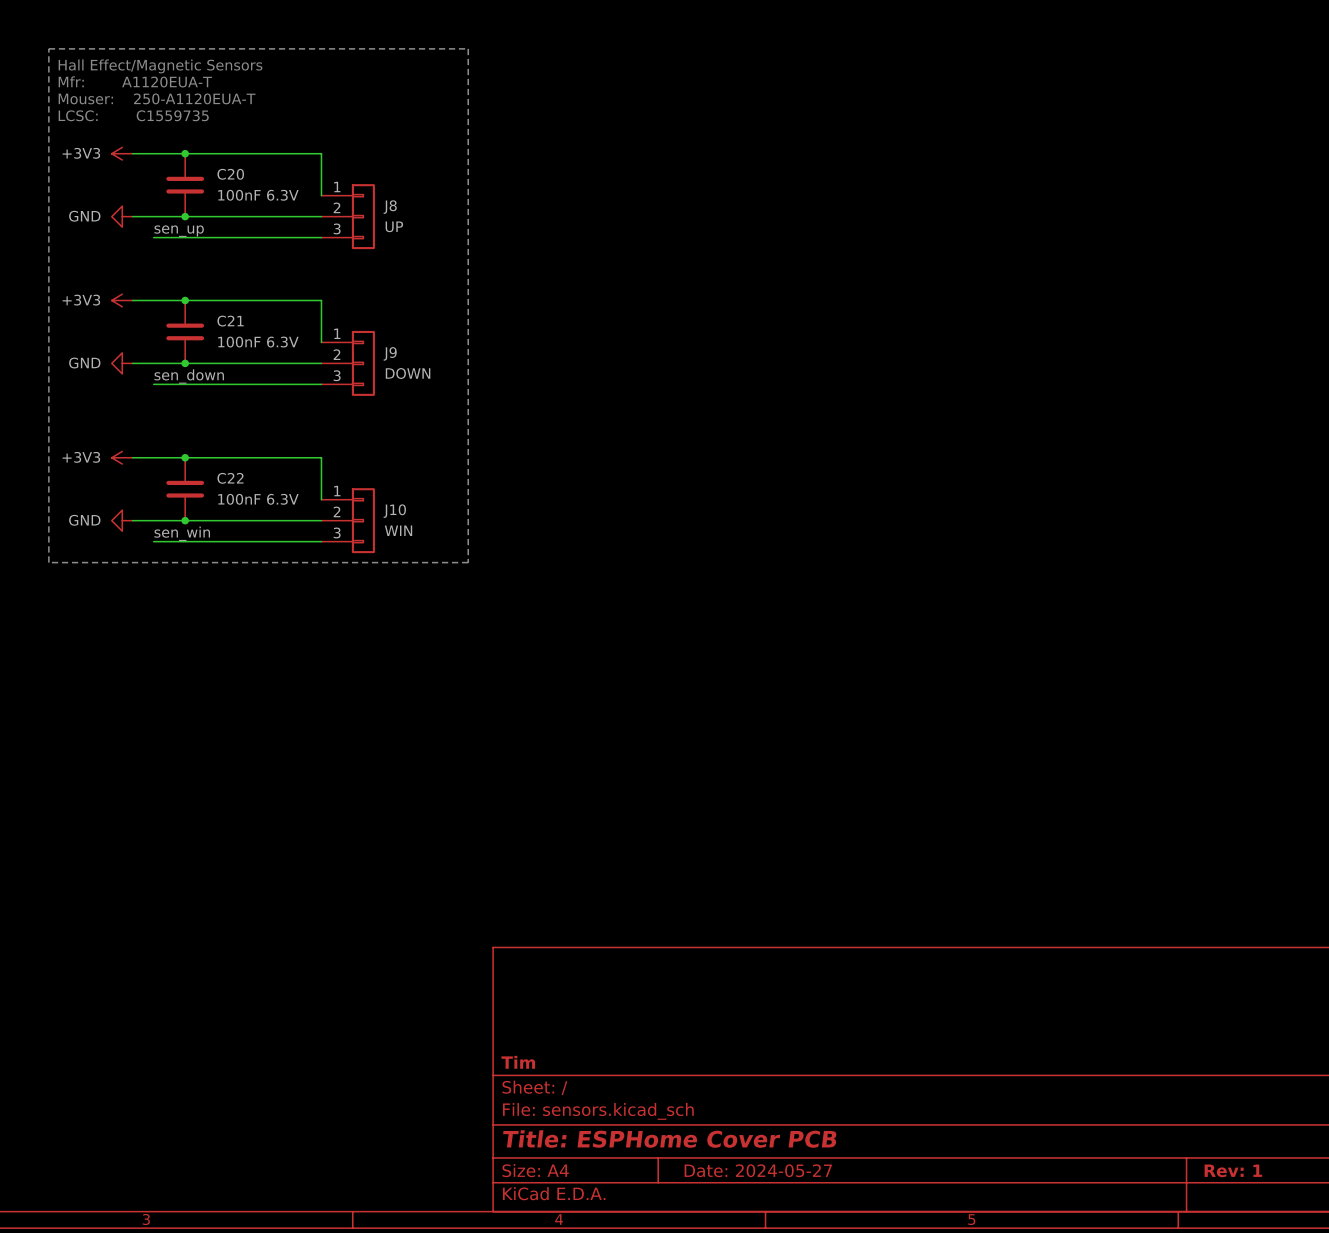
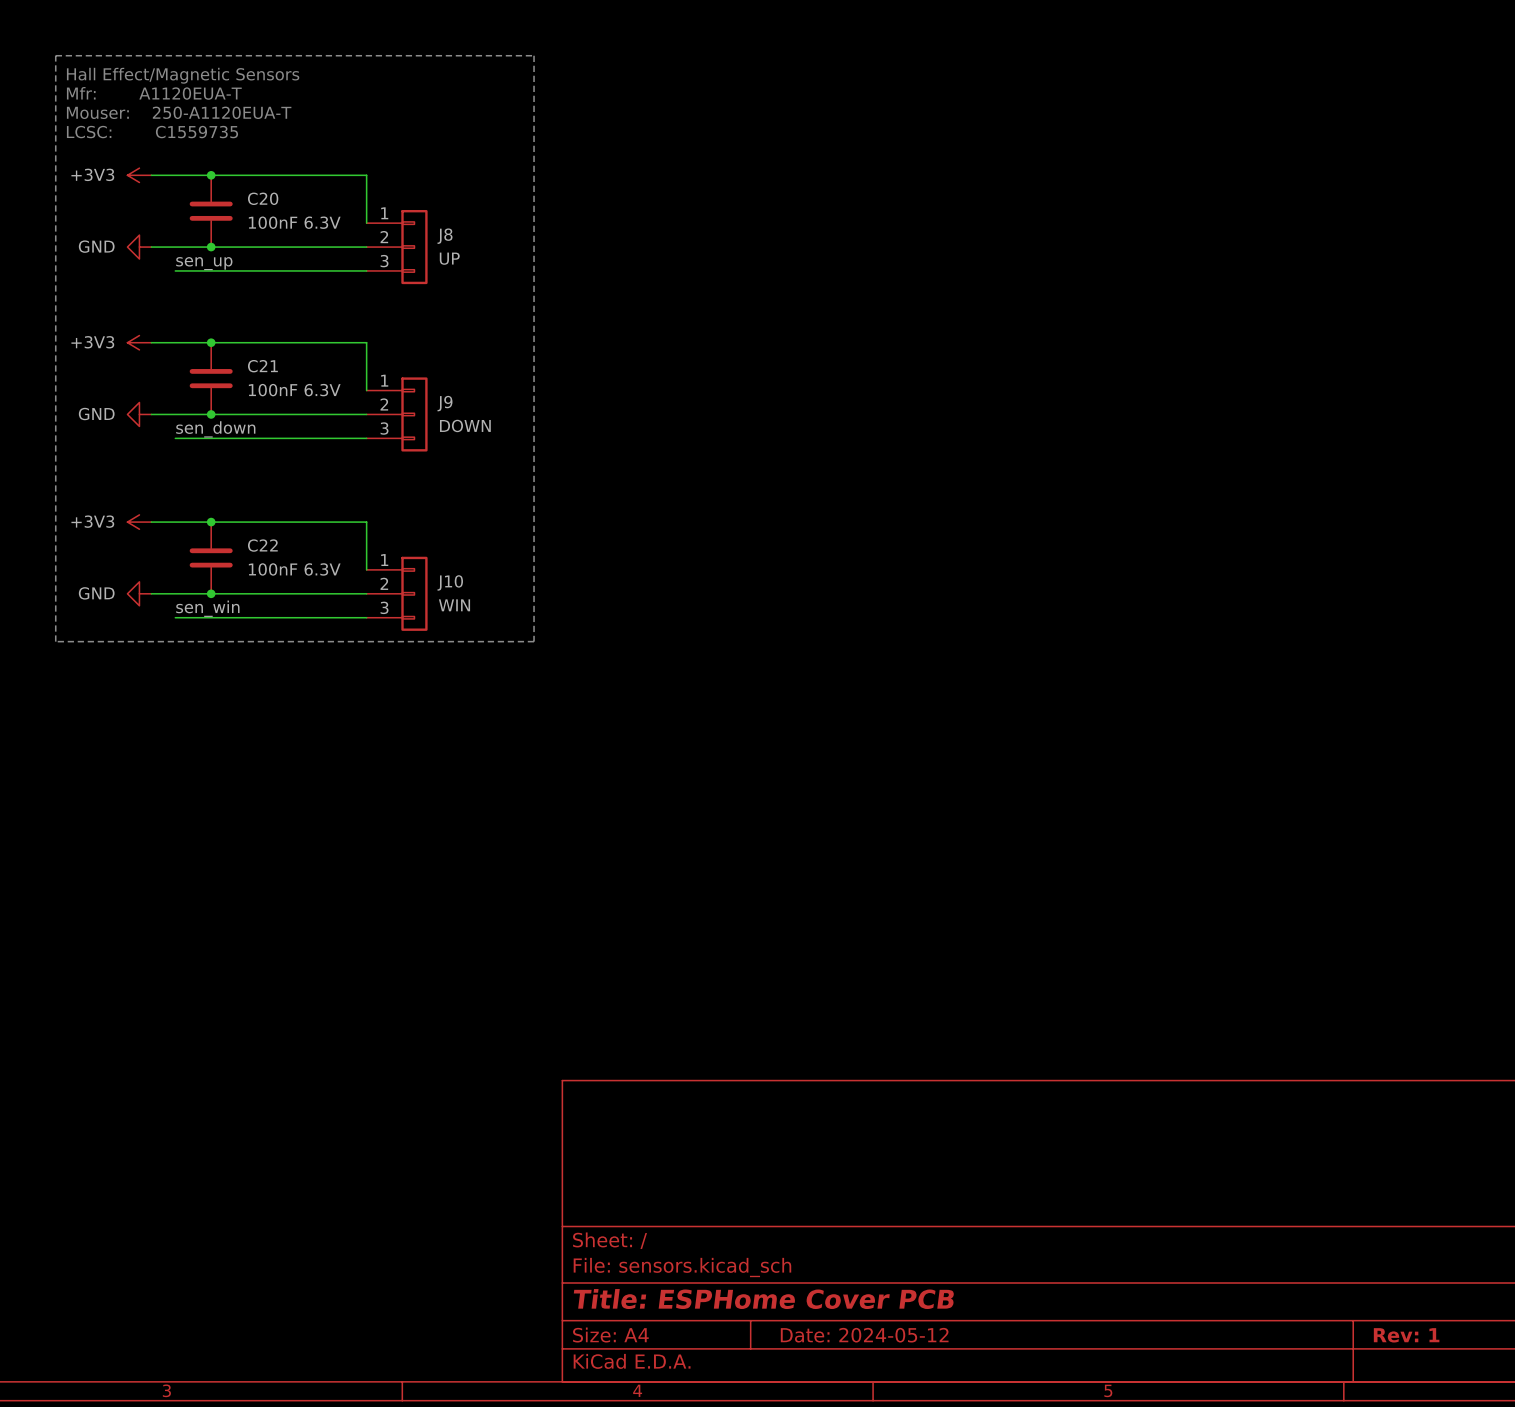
title block: Tim (518, 1062) -> none
title block: Date: 2024-05-27 (758, 1170) -> Date: 2024-05-12 (864, 1335)

